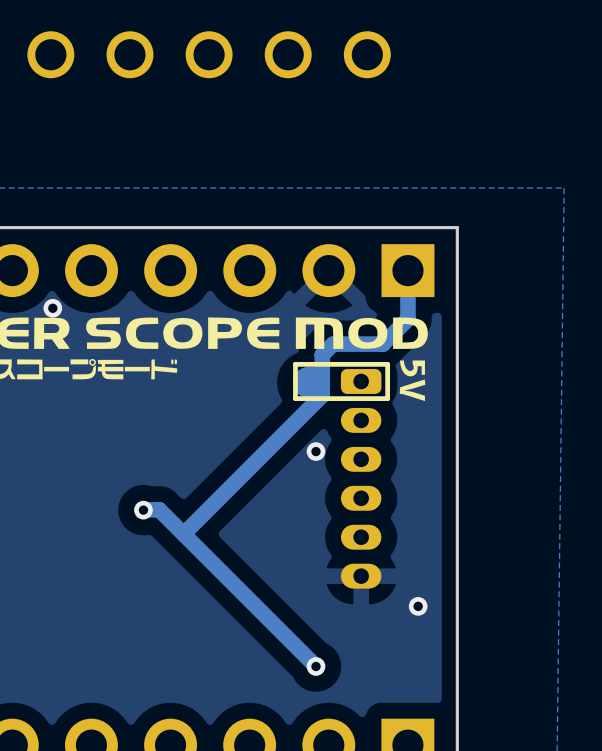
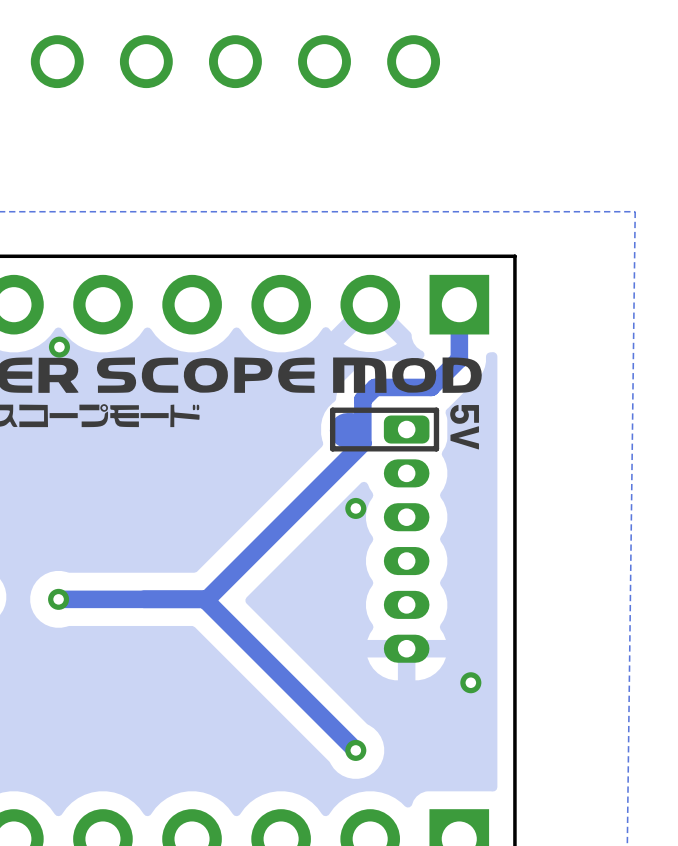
track: (322, 393) (183, 534) -> (362, 443) (207, 599) (58, 599)
track: (143, 509) (159, 509) (181, 532) -> none
via: (143, 510) -> none
via: none -> (58, 599)

